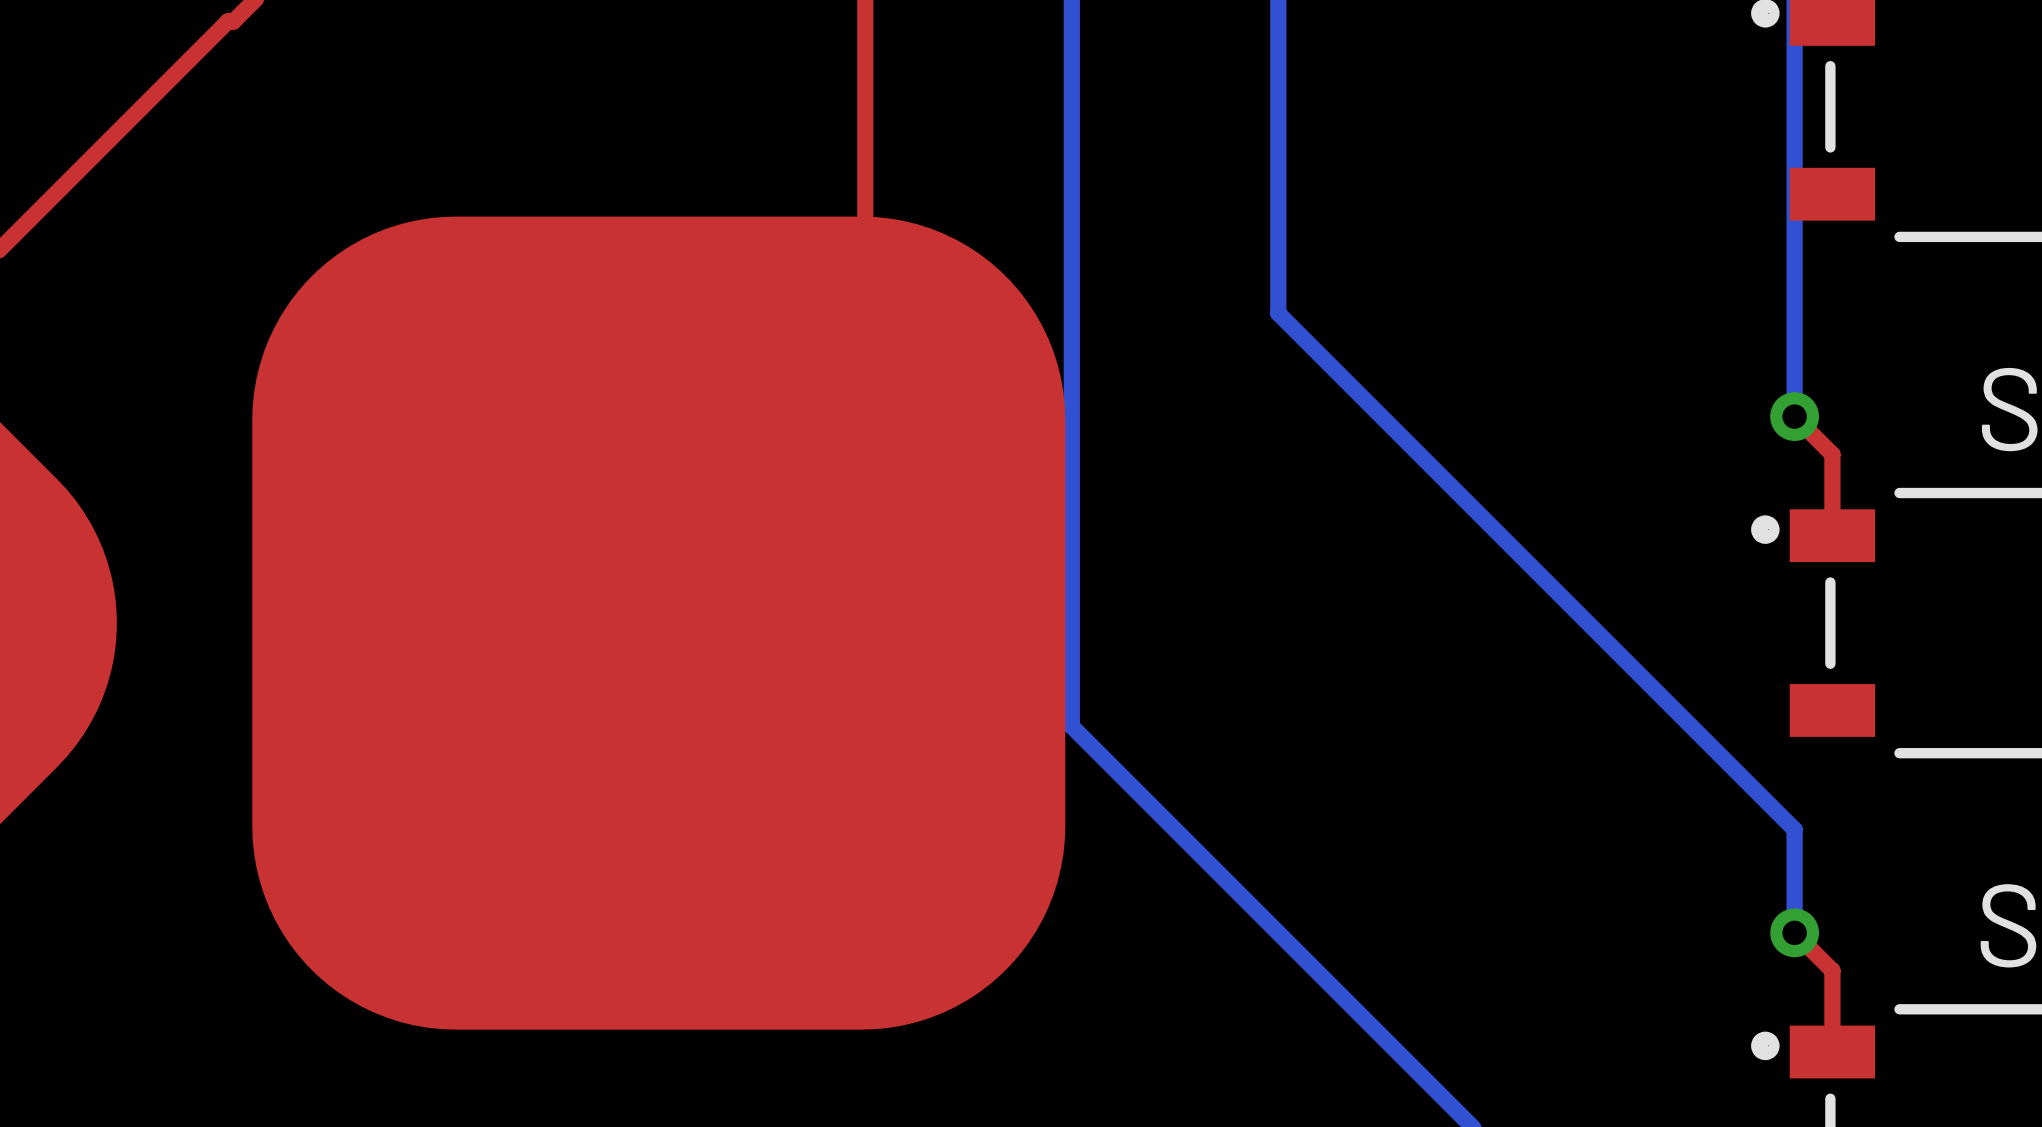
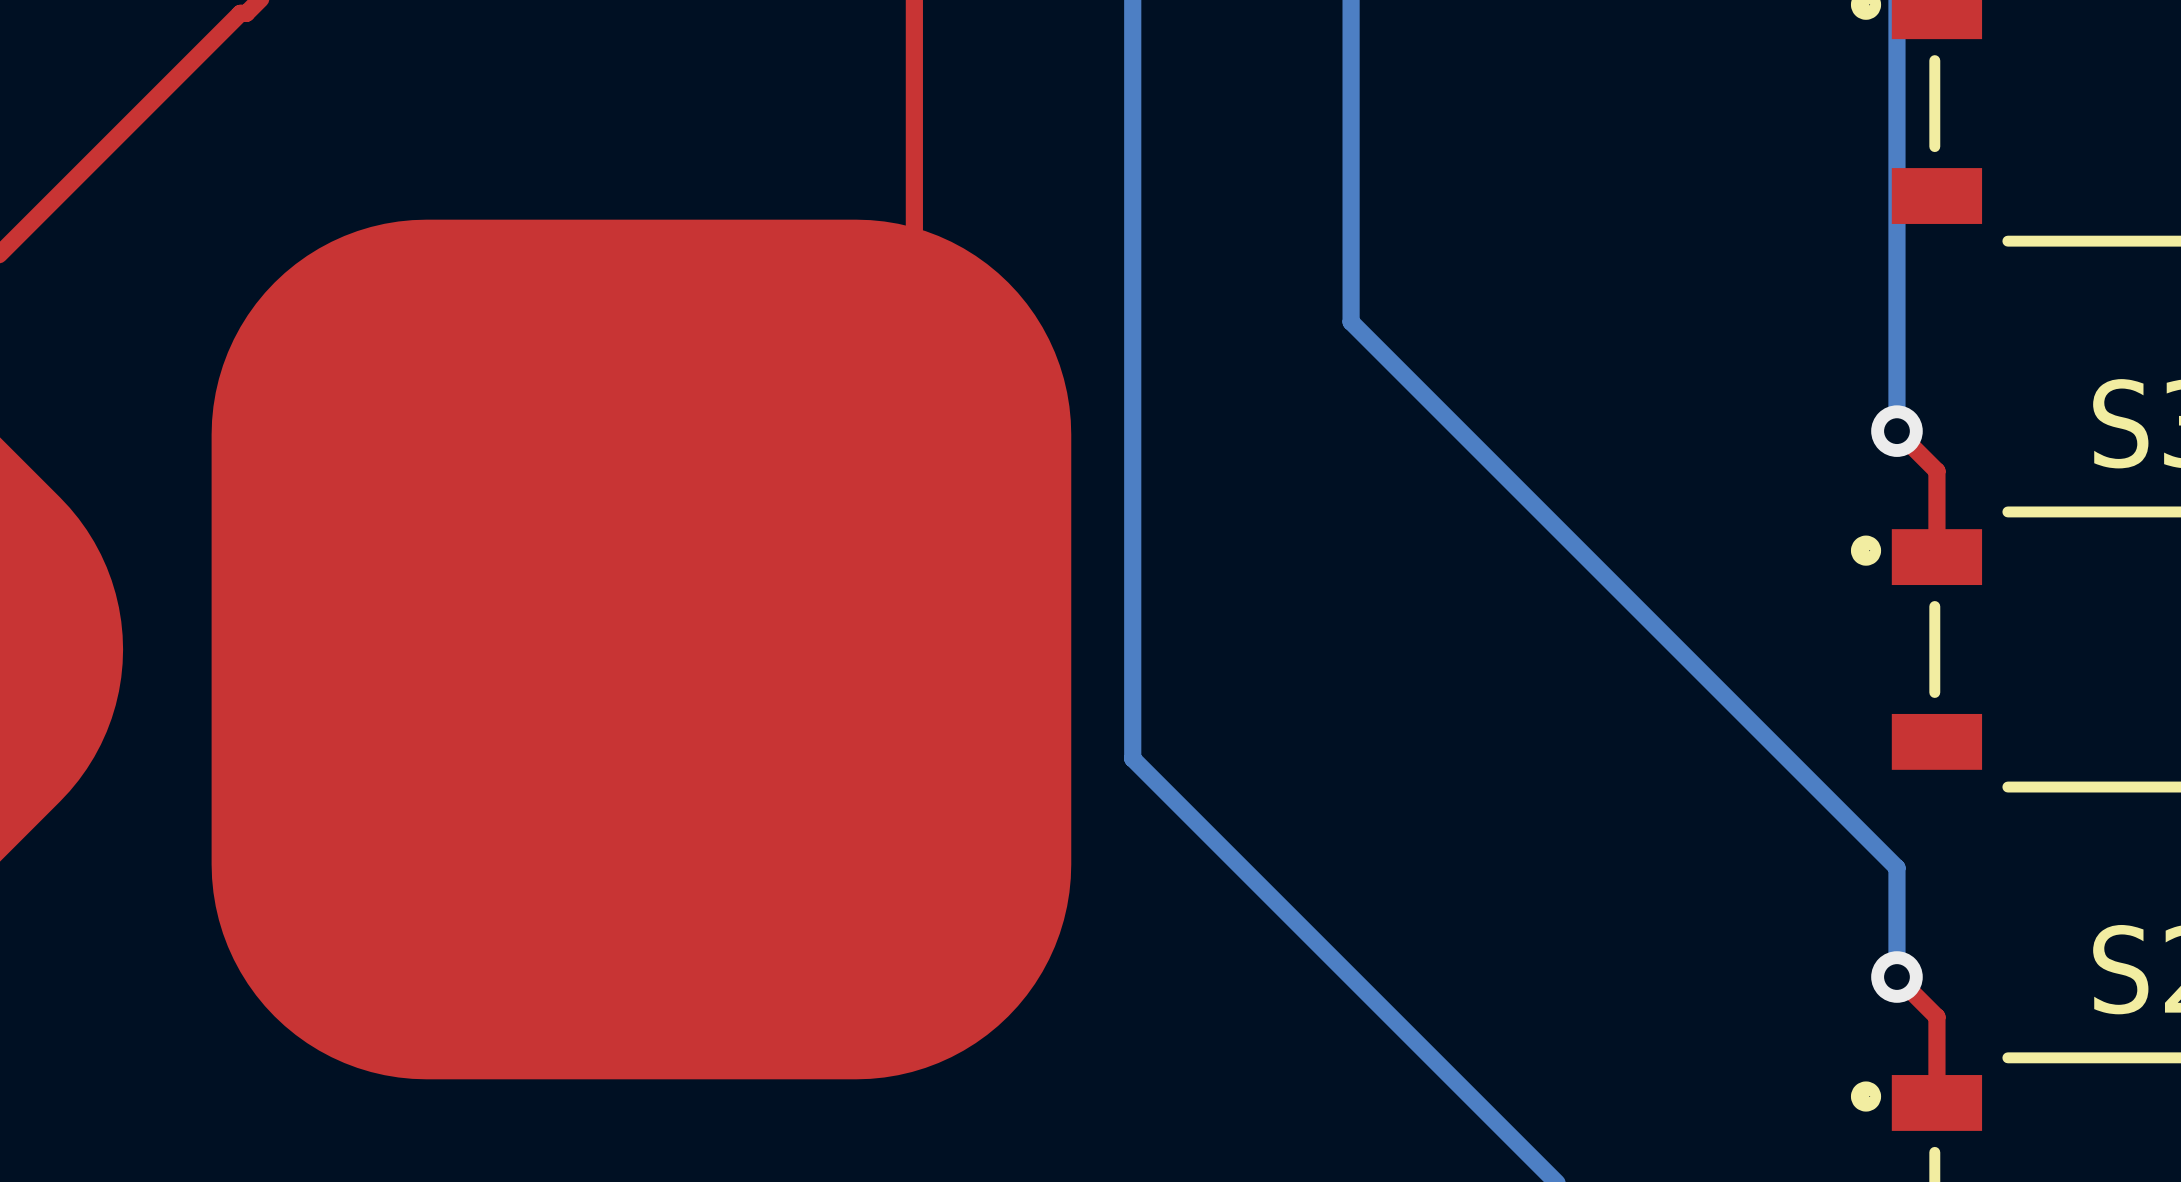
part position: (658, 623) -> (641, 649)

